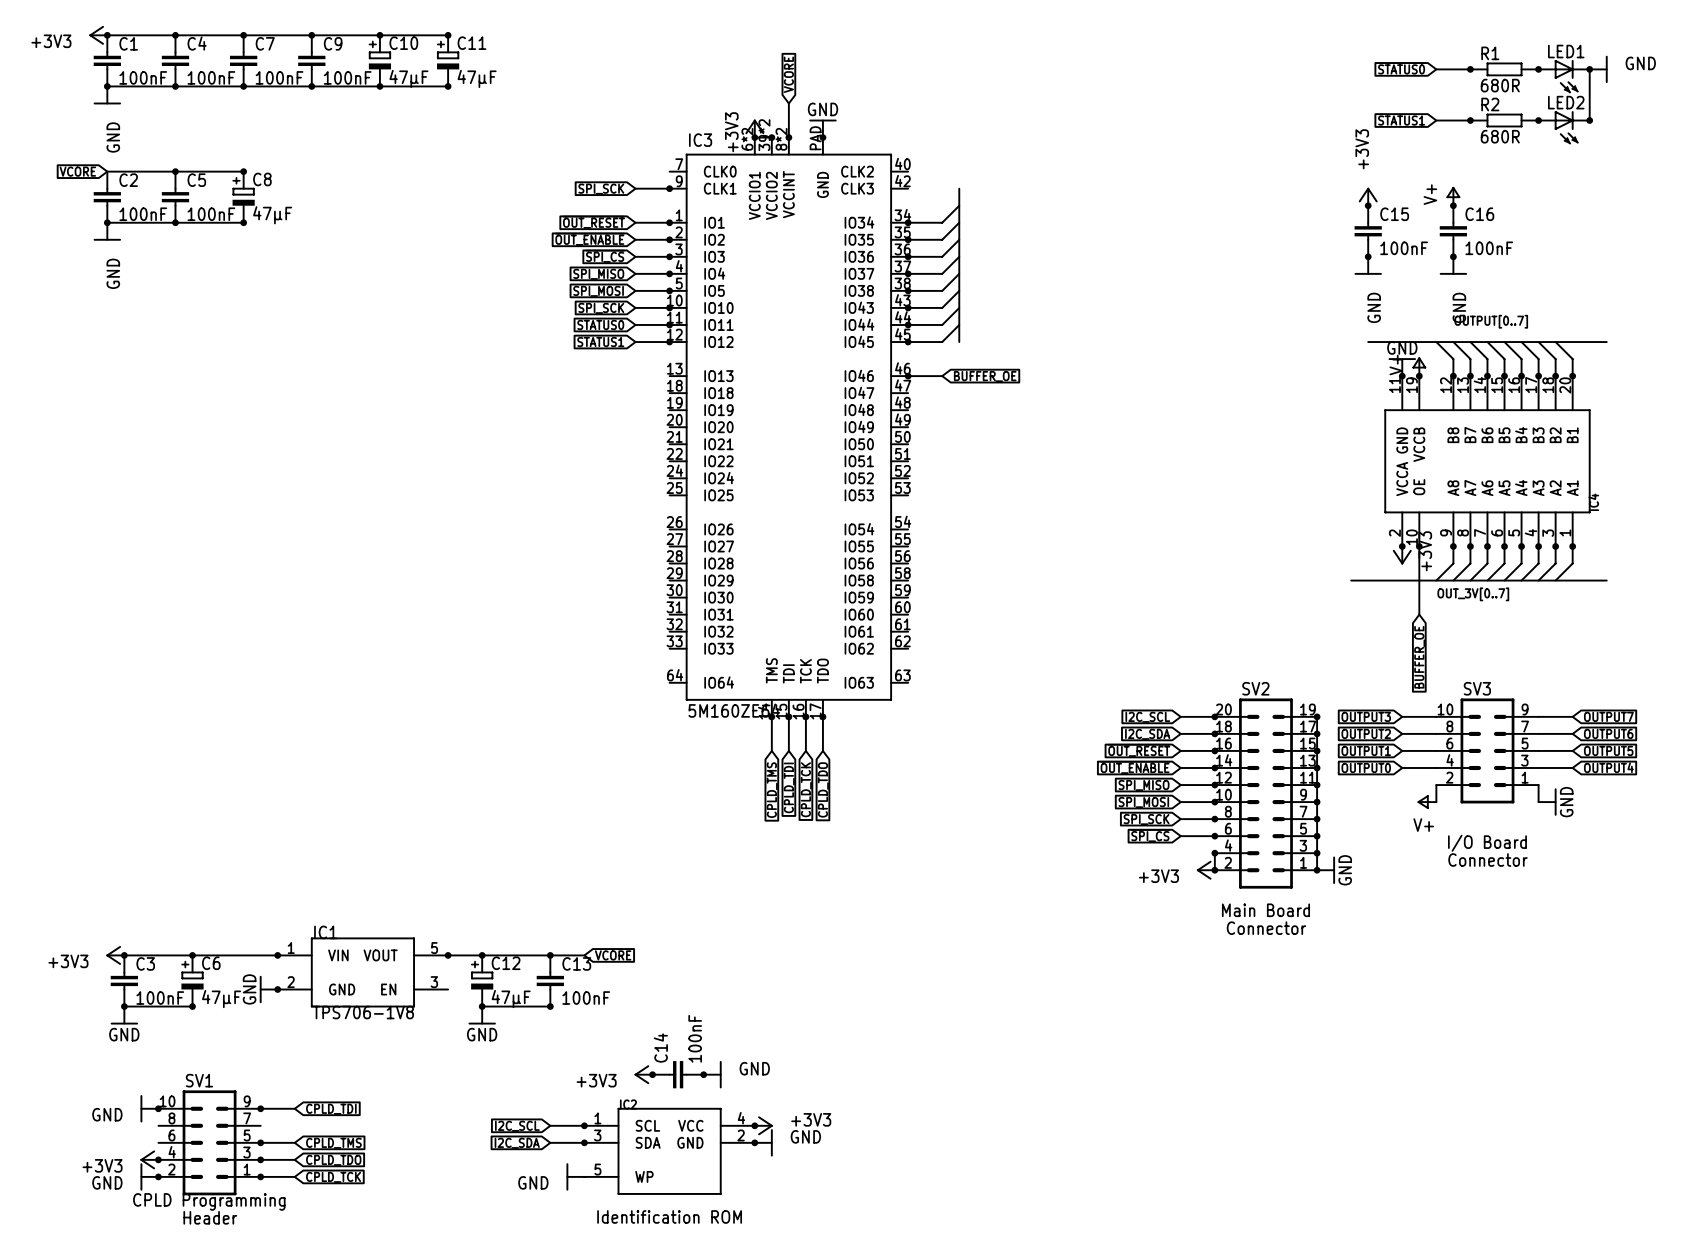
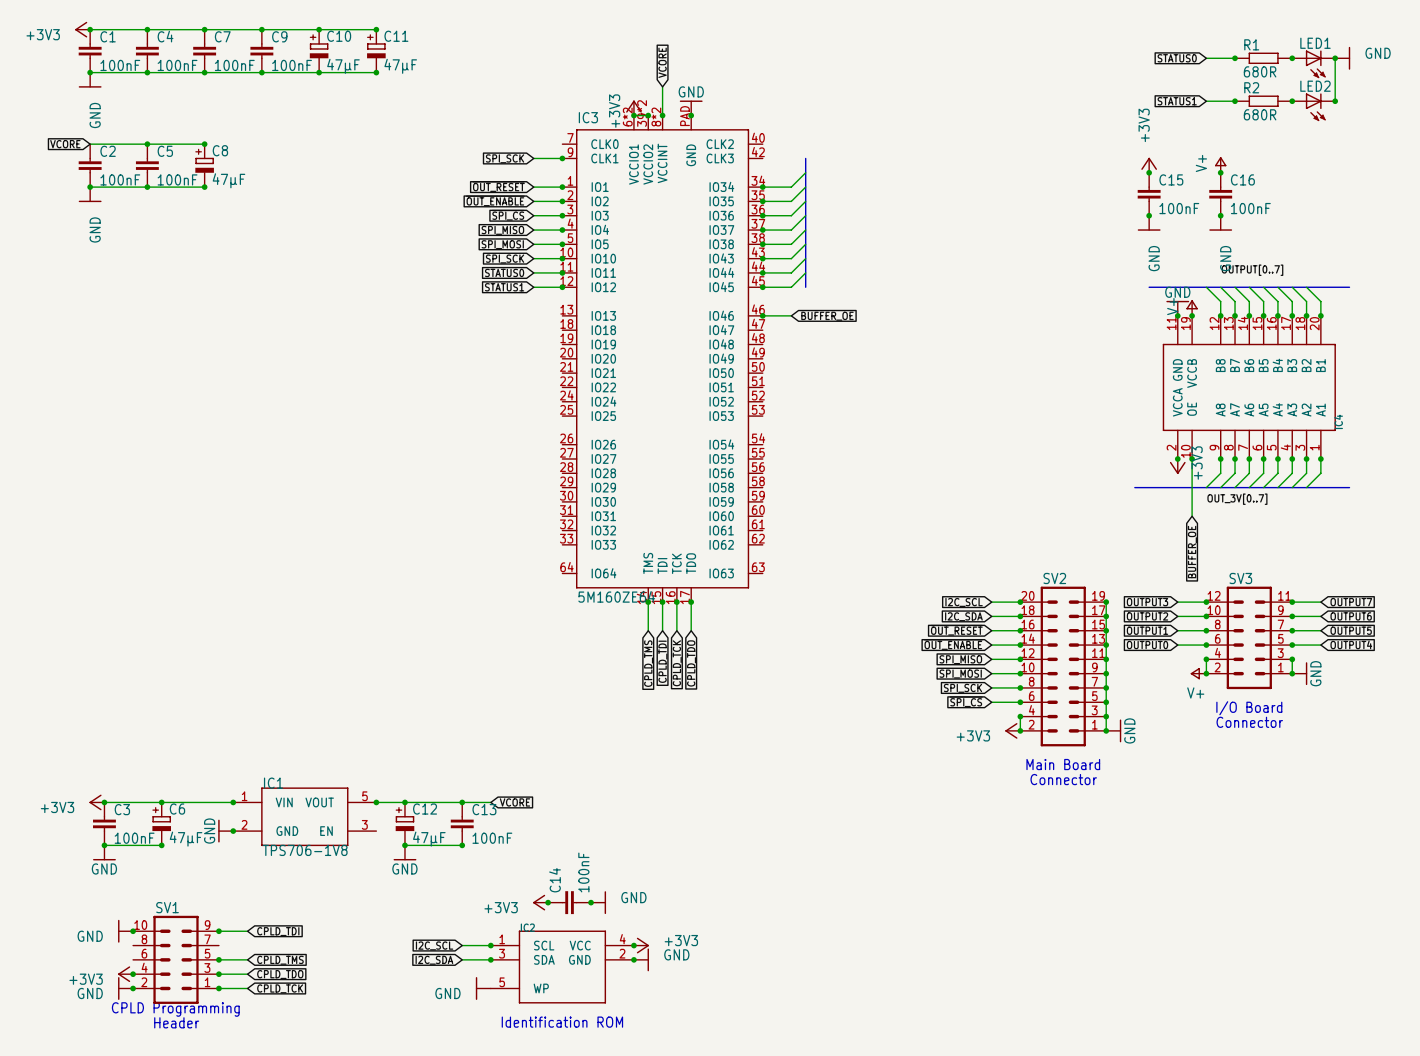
SV3 symbol: [1436, 698, 1539, 804] -> [1206, 586, 1293, 690]
junction: none -> (1206, 602)
junction: none -> (1292, 602)
junction: none -> (1206, 616)
junction: none -> (1292, 616)
junction: none -> (1206, 630)
junction: none -> (1292, 630)
junction: none -> (1206, 645)
junction: none -> (1292, 645)
junction: none -> (1206, 659)
junction: none -> (1292, 659)
junction: none -> (1206, 673)
junction: none -> (1292, 673)

